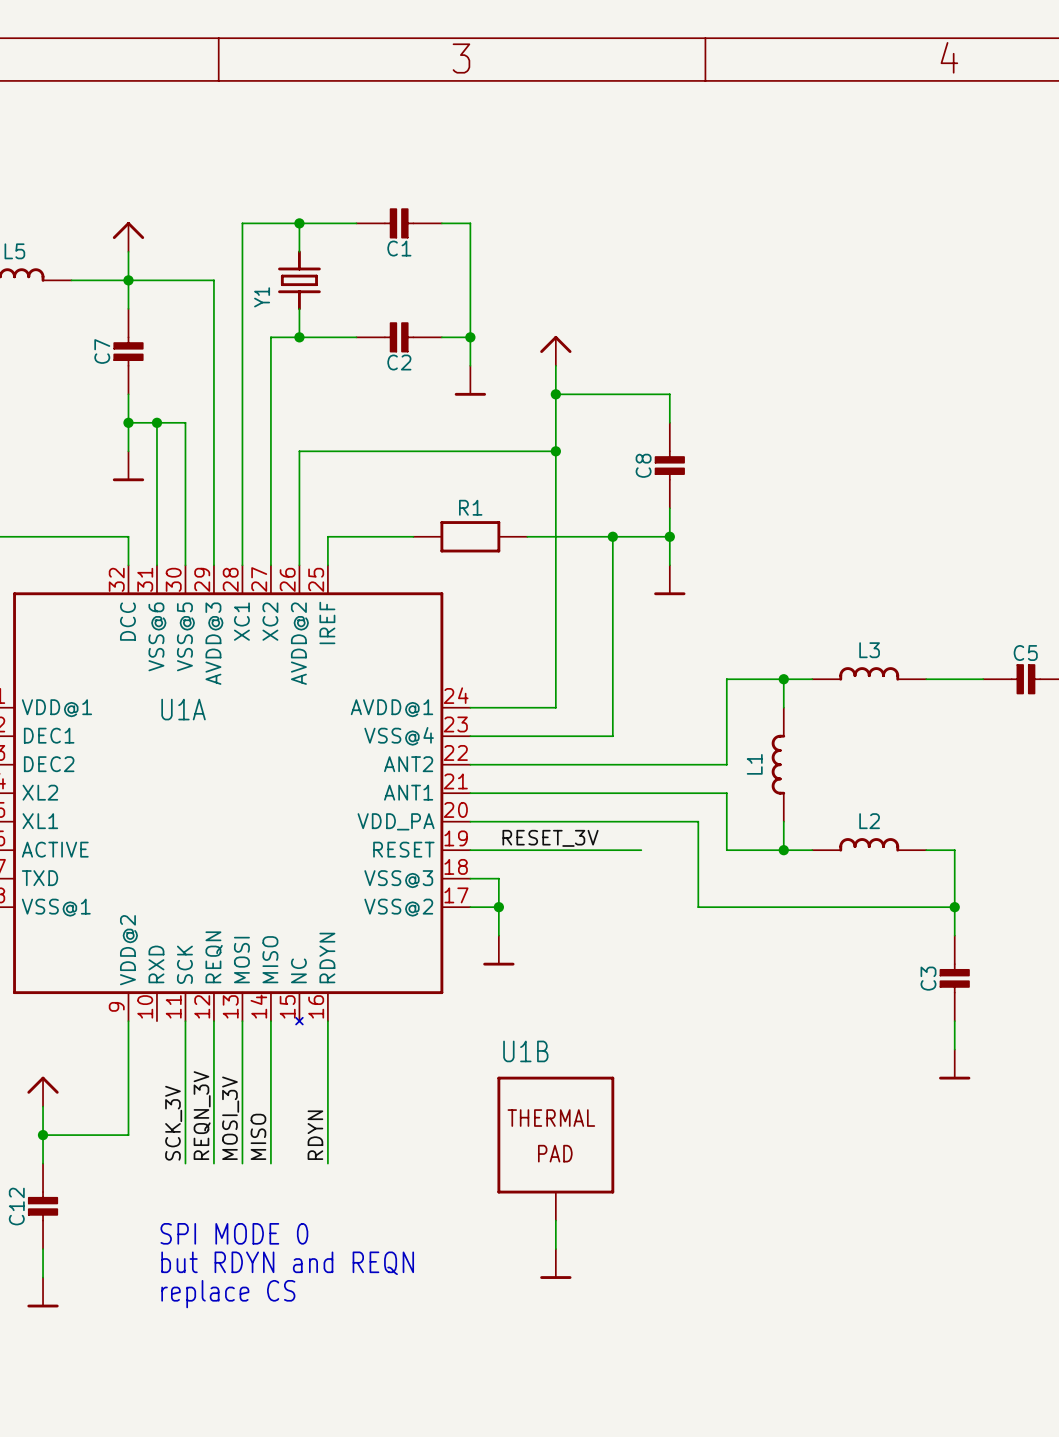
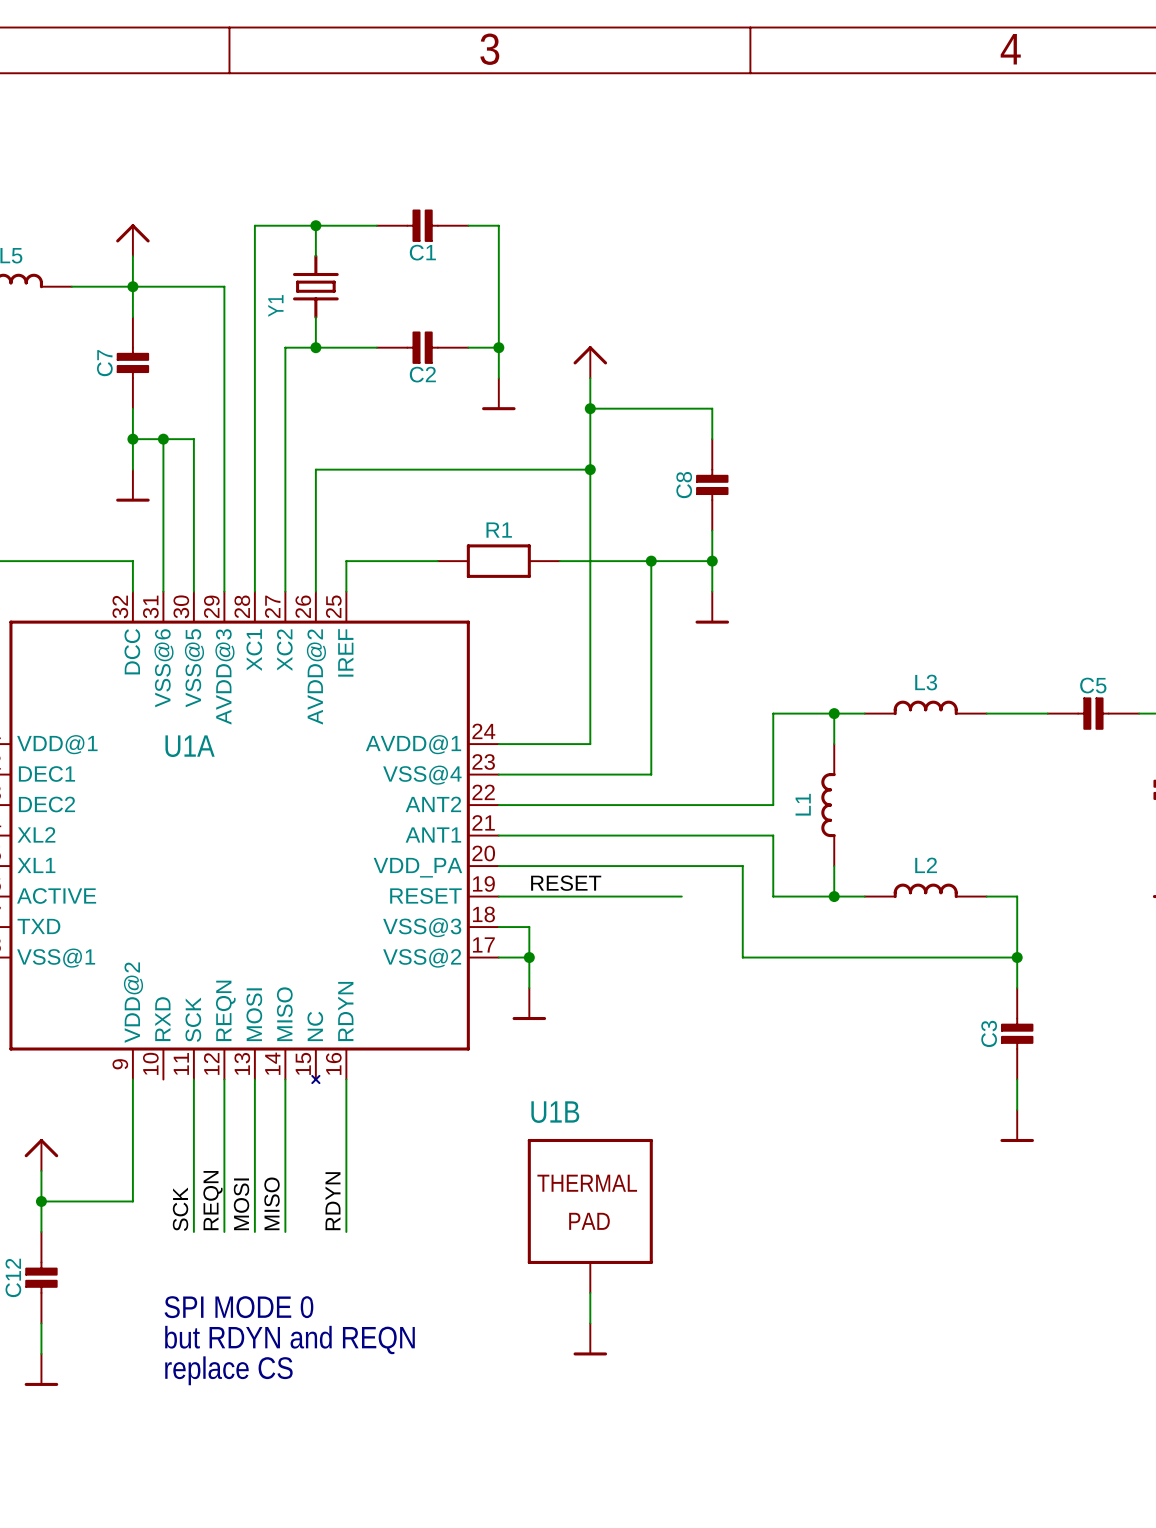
label: RESET_3V (550, 838) -> RESET (566, 883)
label: REQN_3V (202, 1115) -> REQN (212, 1200)
label: MOSI_3V (230, 1118) -> MOSI (241, 1204)
label: SCK_3V (173, 1123) -> SCK (180, 1209)

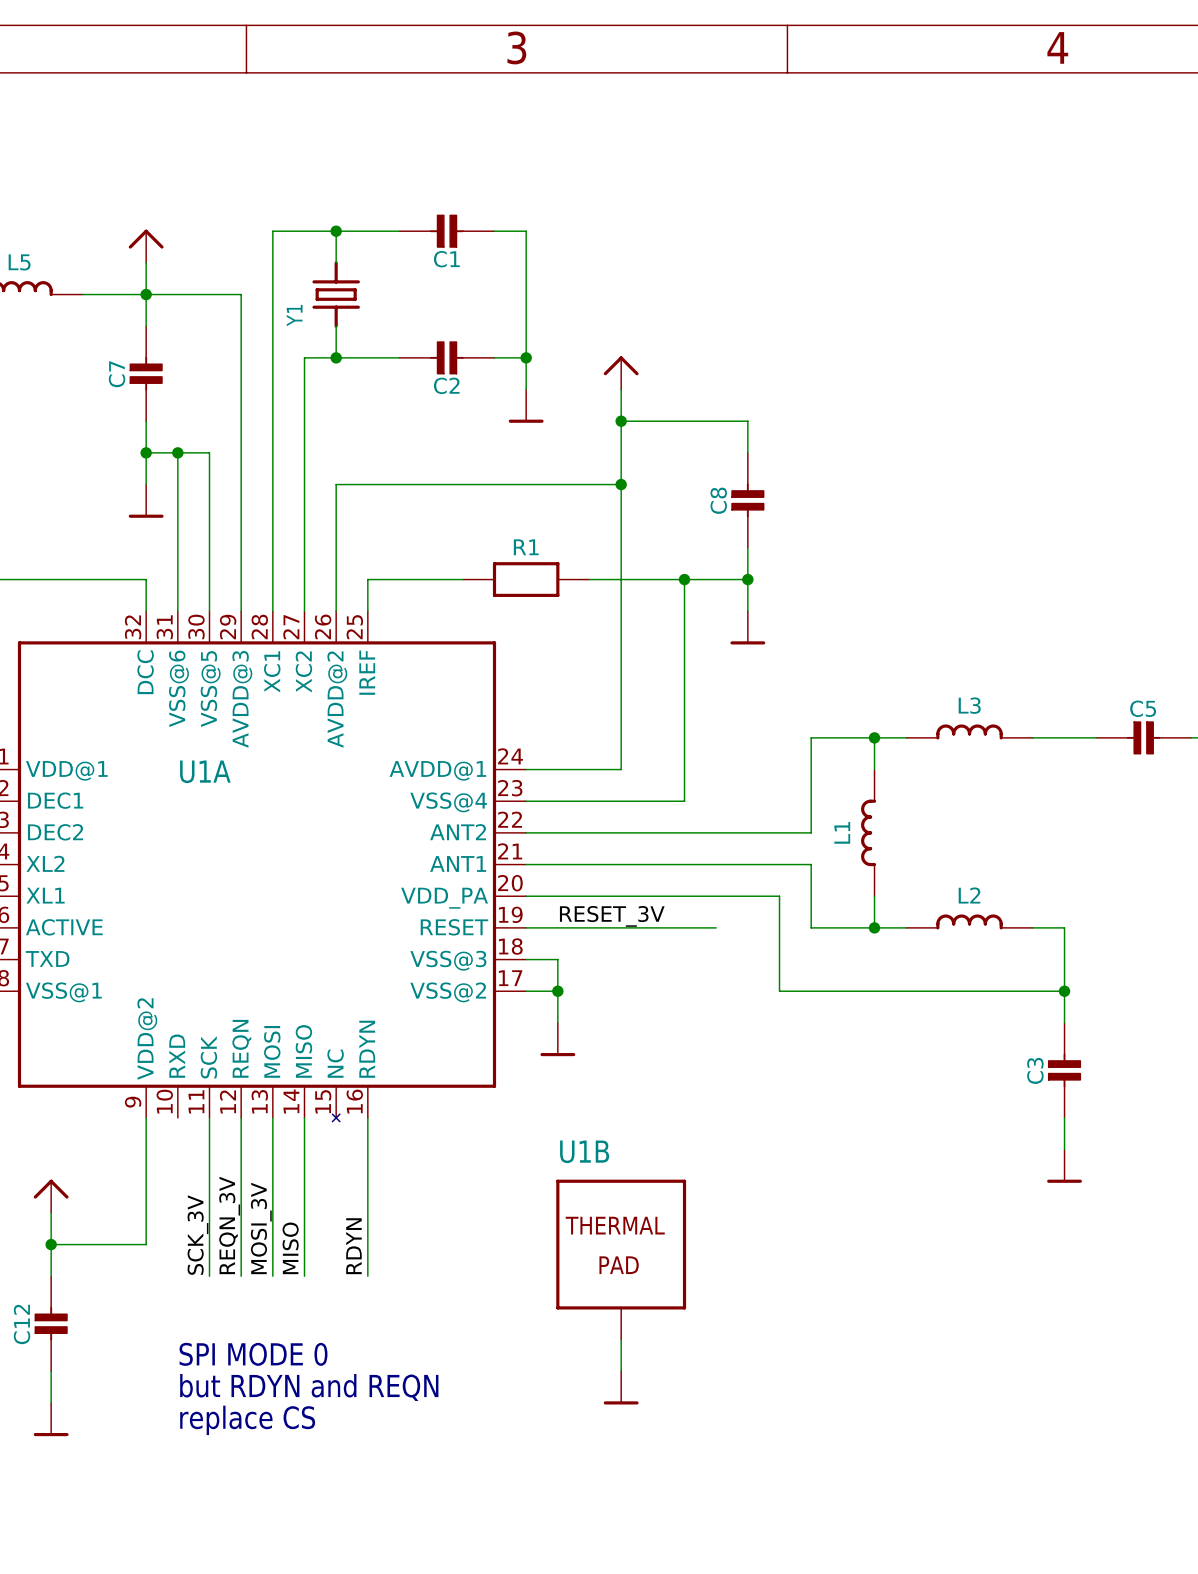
label: RESET (566, 883) -> RESET_3V (612, 916)
label: REQN (212, 1200) -> REQN_3V (229, 1225)
label: MOSI (241, 1204) -> MOSI_3V (261, 1228)
label: SCK (180, 1209) -> SCK_3V (197, 1235)

